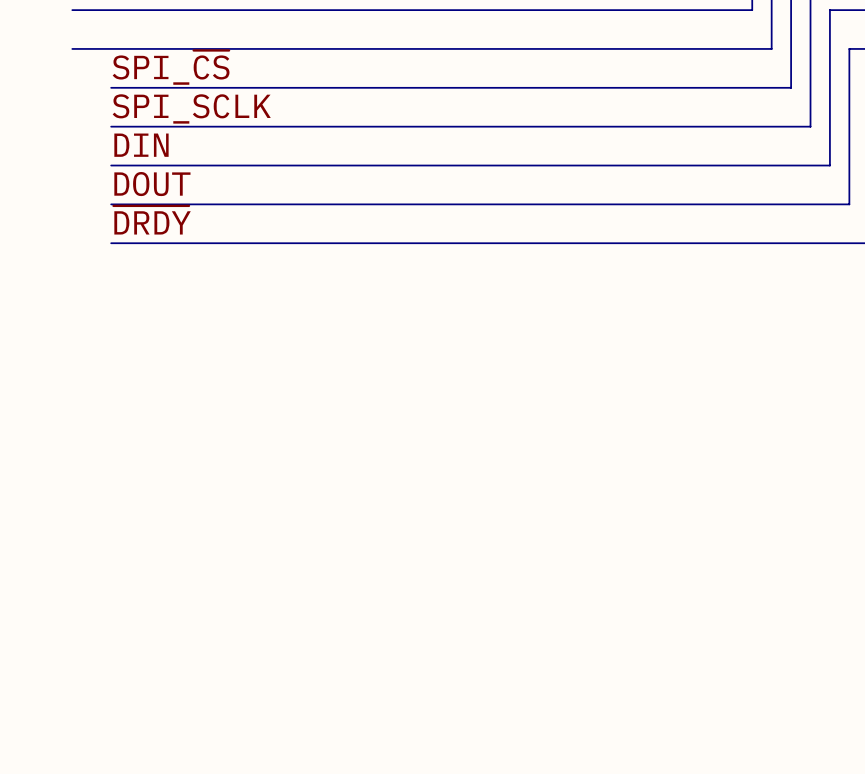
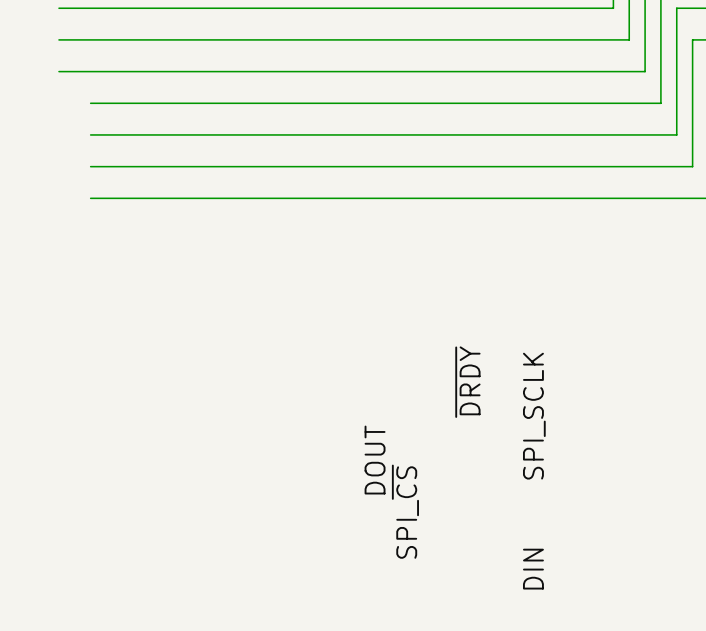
label: SPI_~{CS} (171, 67) -> none
wire: none -> (58, 71) (90, 71)
label: SPI_SCLK (191, 108) -> none
label: DIN (141, 145) -> none
label: DOUT (152, 184) -> none
label: ~{DRDY} (152, 220) -> none
label: none -> ~{DRDY} (467, 382)
label: none -> SPI_SCLK (534, 416)
label: none -> DOUT (375, 460)
label: none -> SPI_~{CS} (405, 511)
label: none -> DIN (533, 569)

